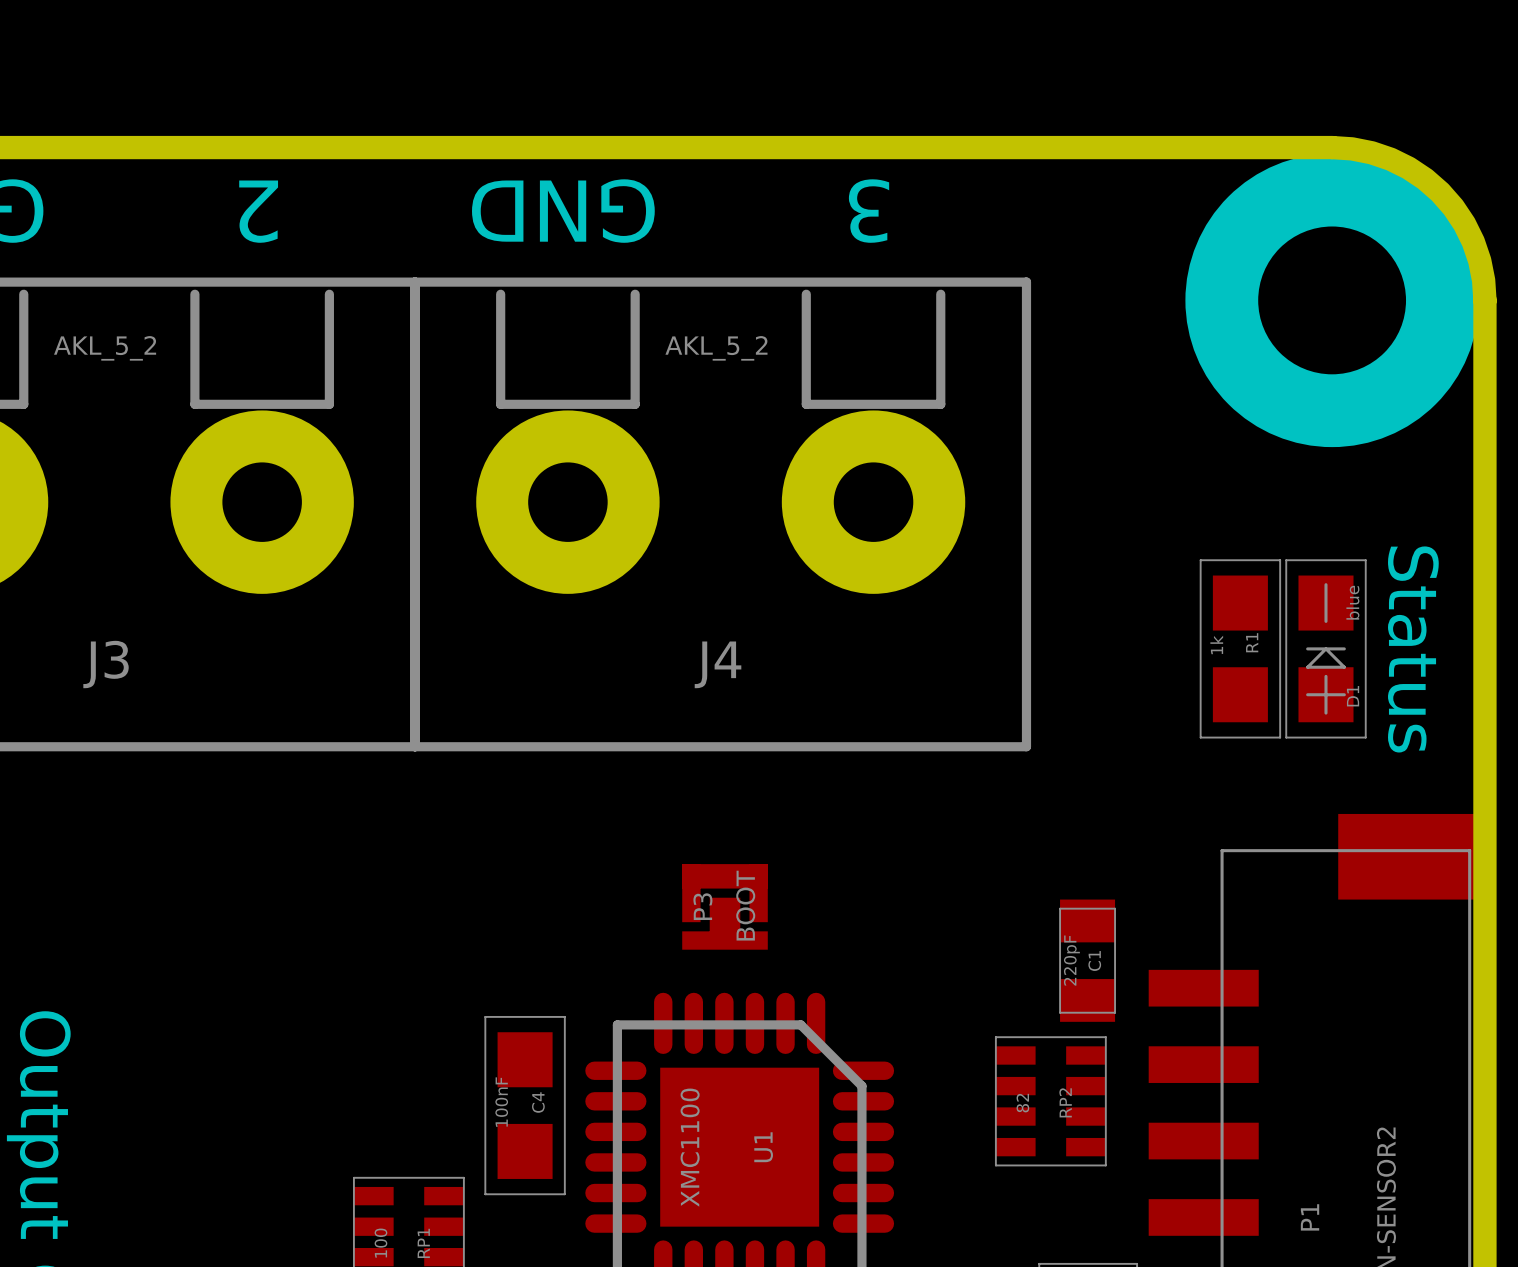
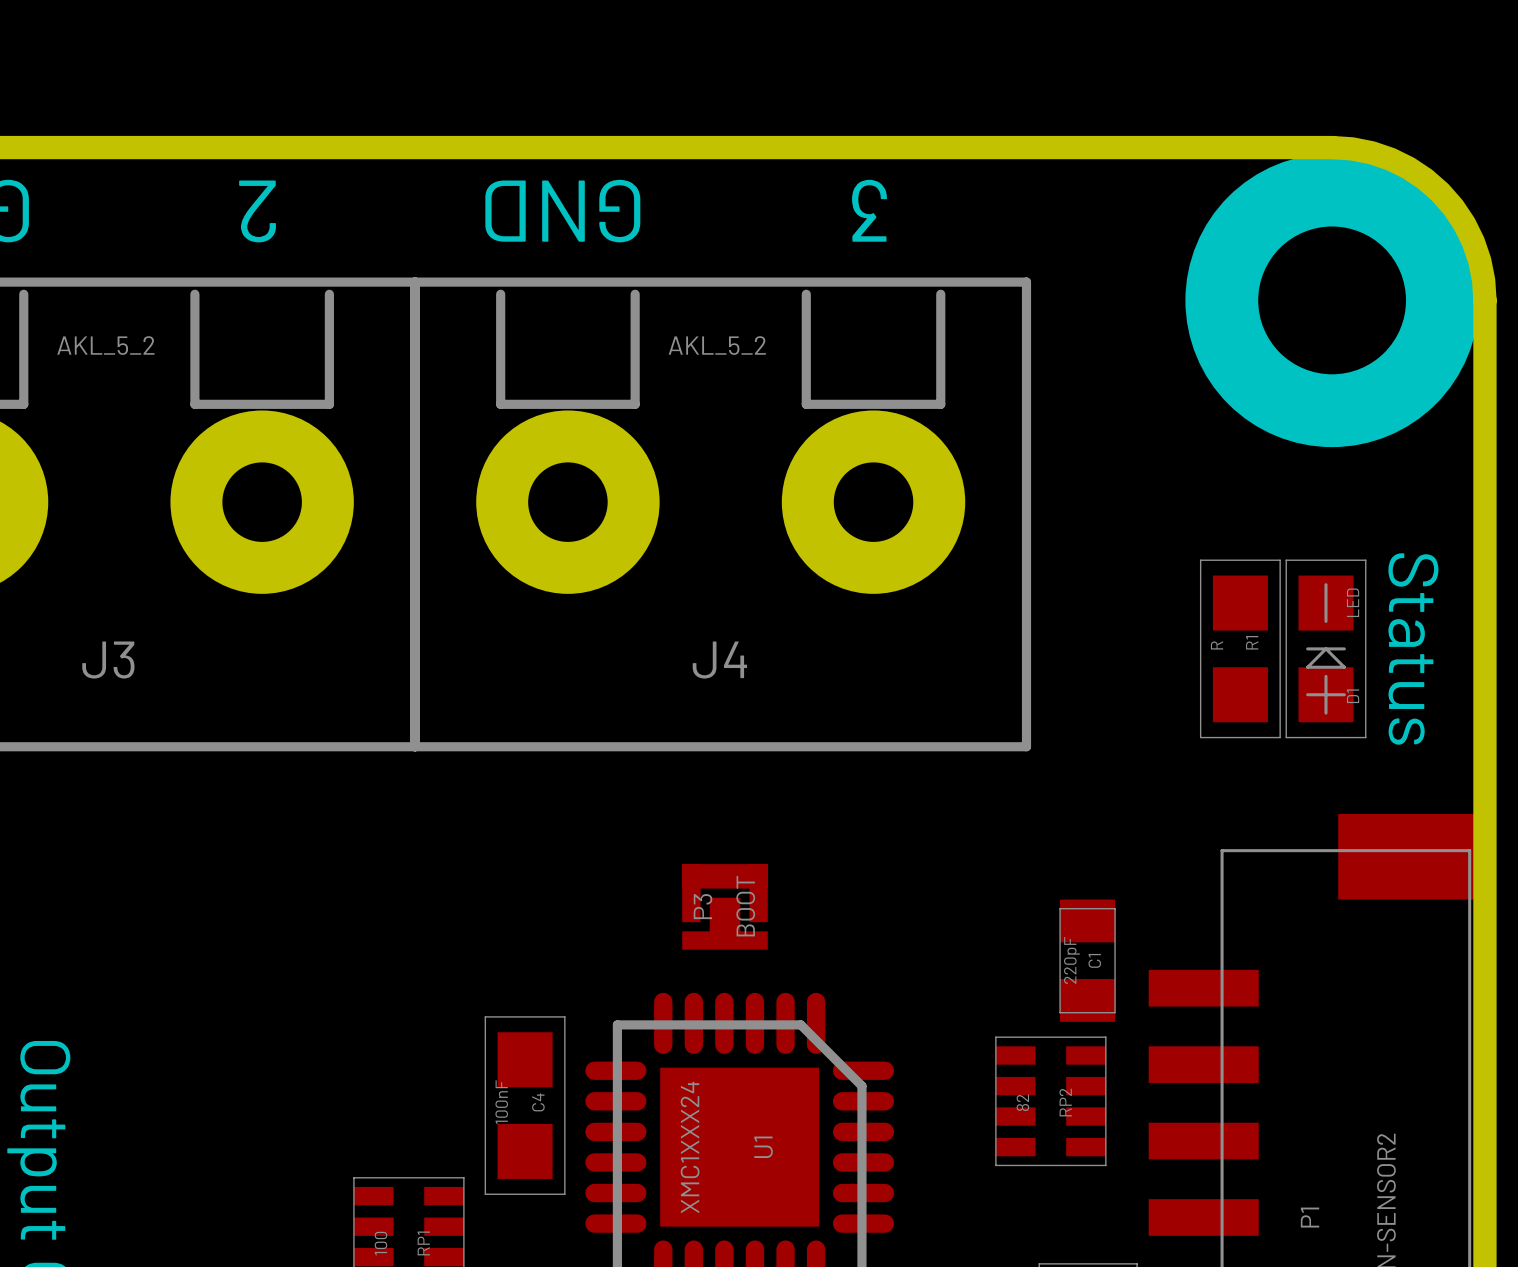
D1 value: blue (1352, 602) -> LED (1353, 602)
R1 value: 1k (1216, 644) -> R (1217, 645)
U1 value: XMC1100 (690, 1147) -> XMC1XXX24 (690, 1147)

